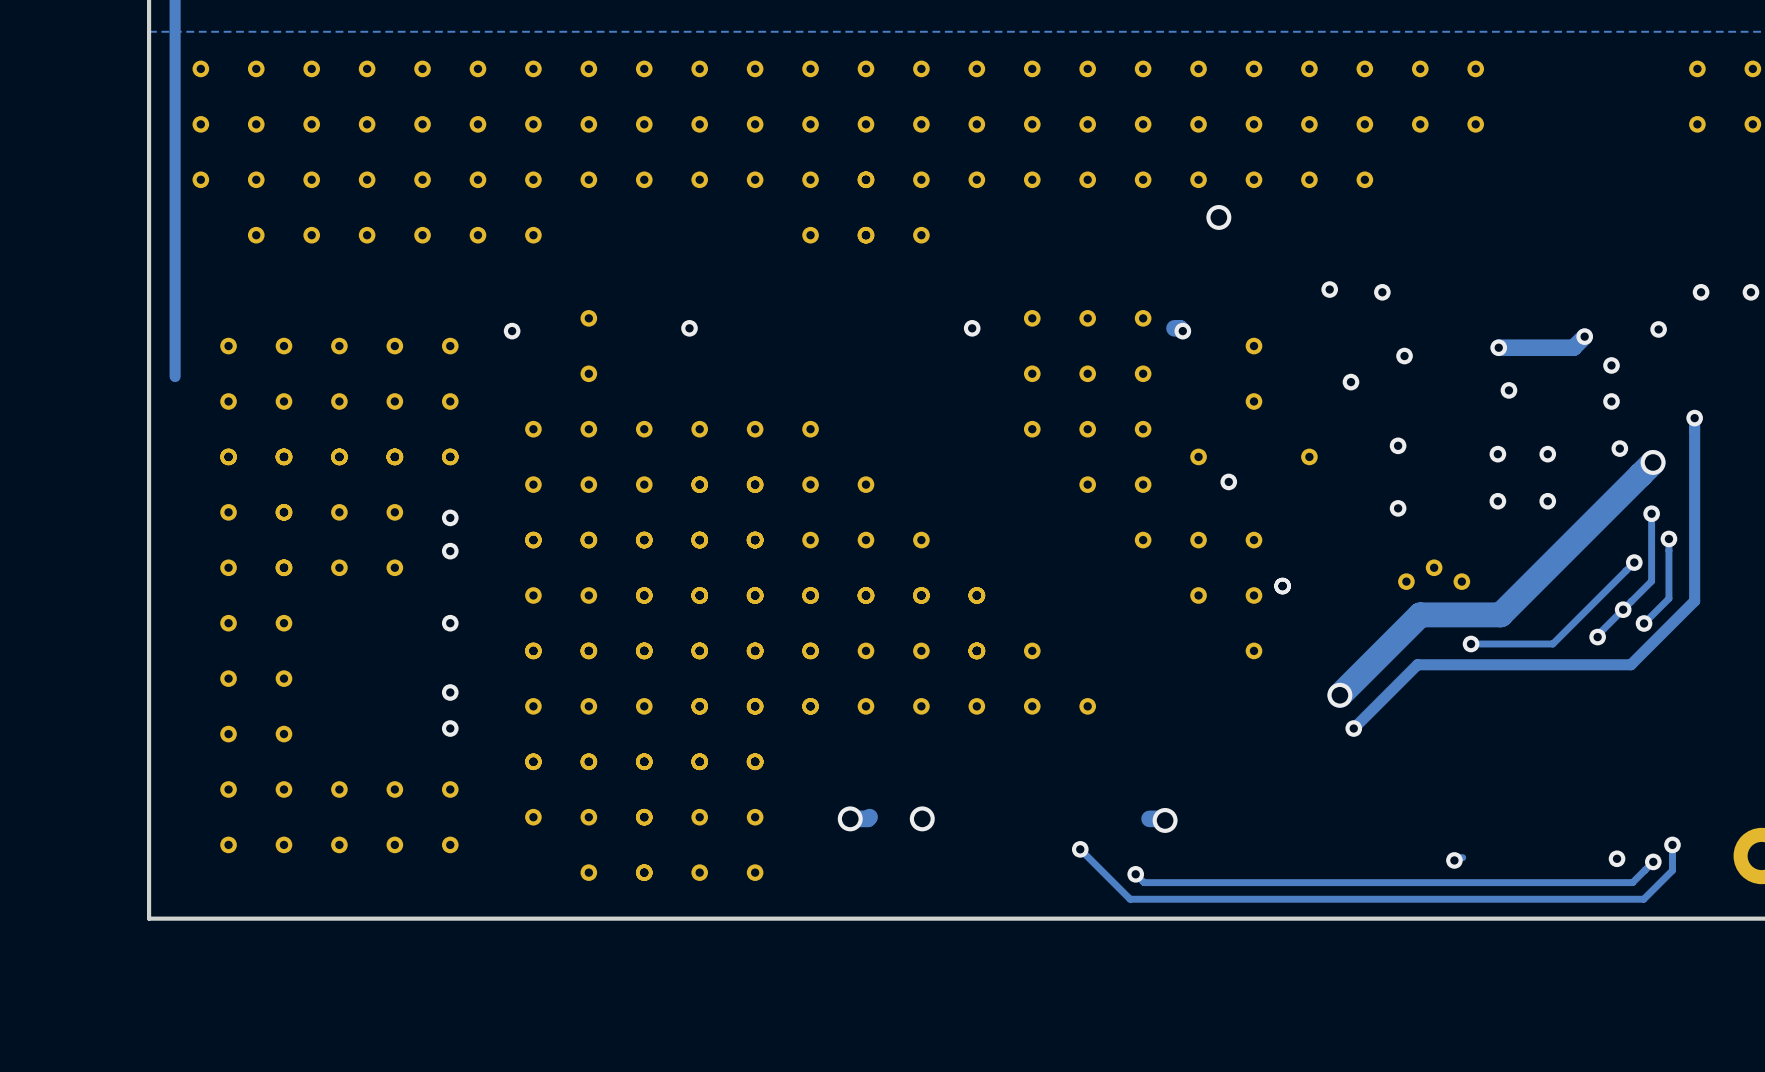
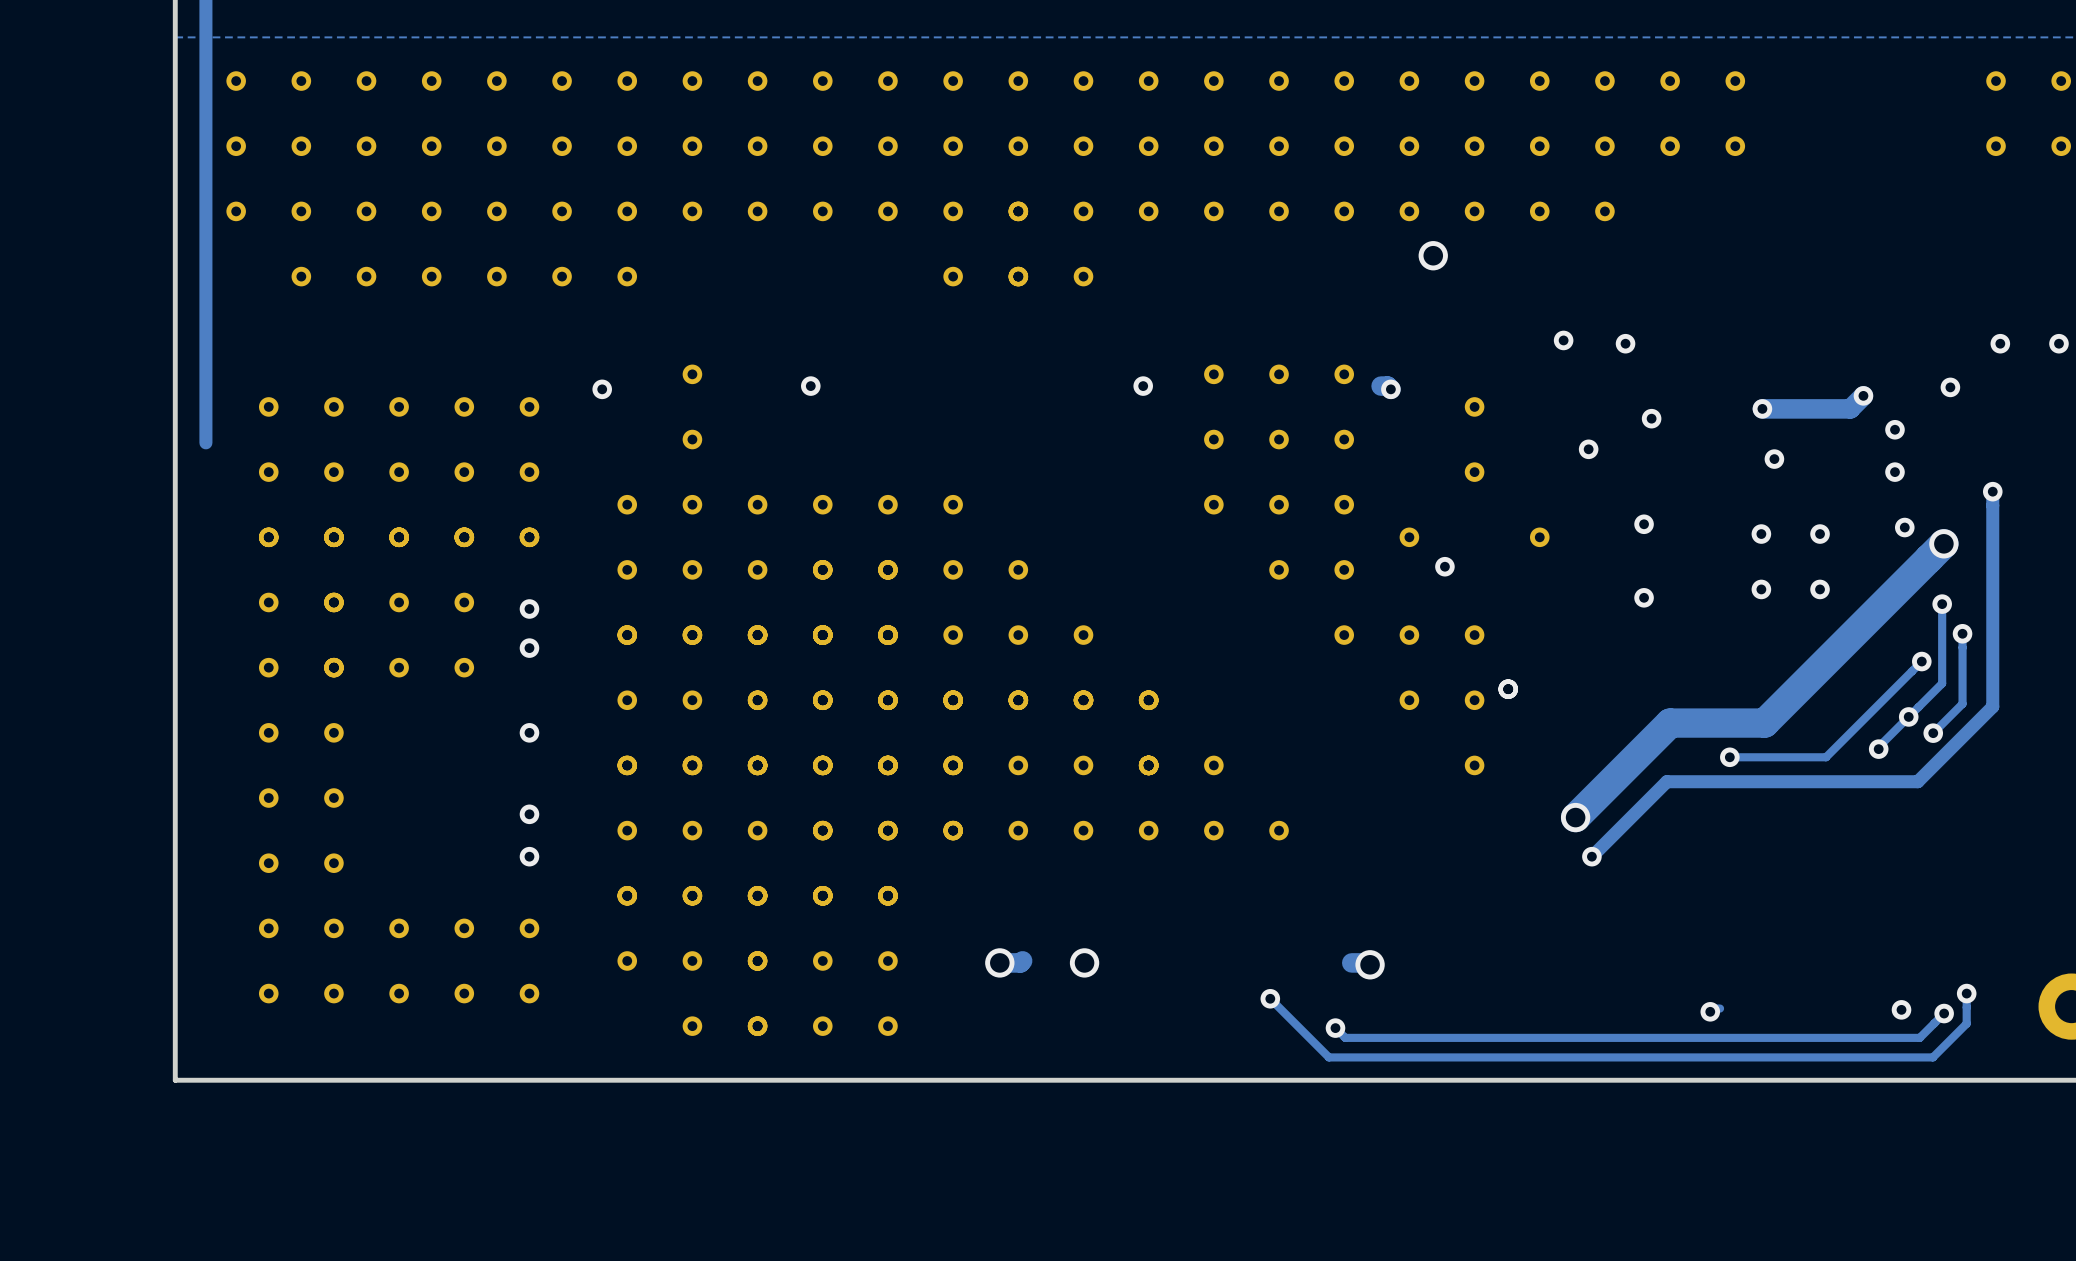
part: (1434, 567) -> none
part: (1406, 581) -> none
part: (1461, 581) -> none

